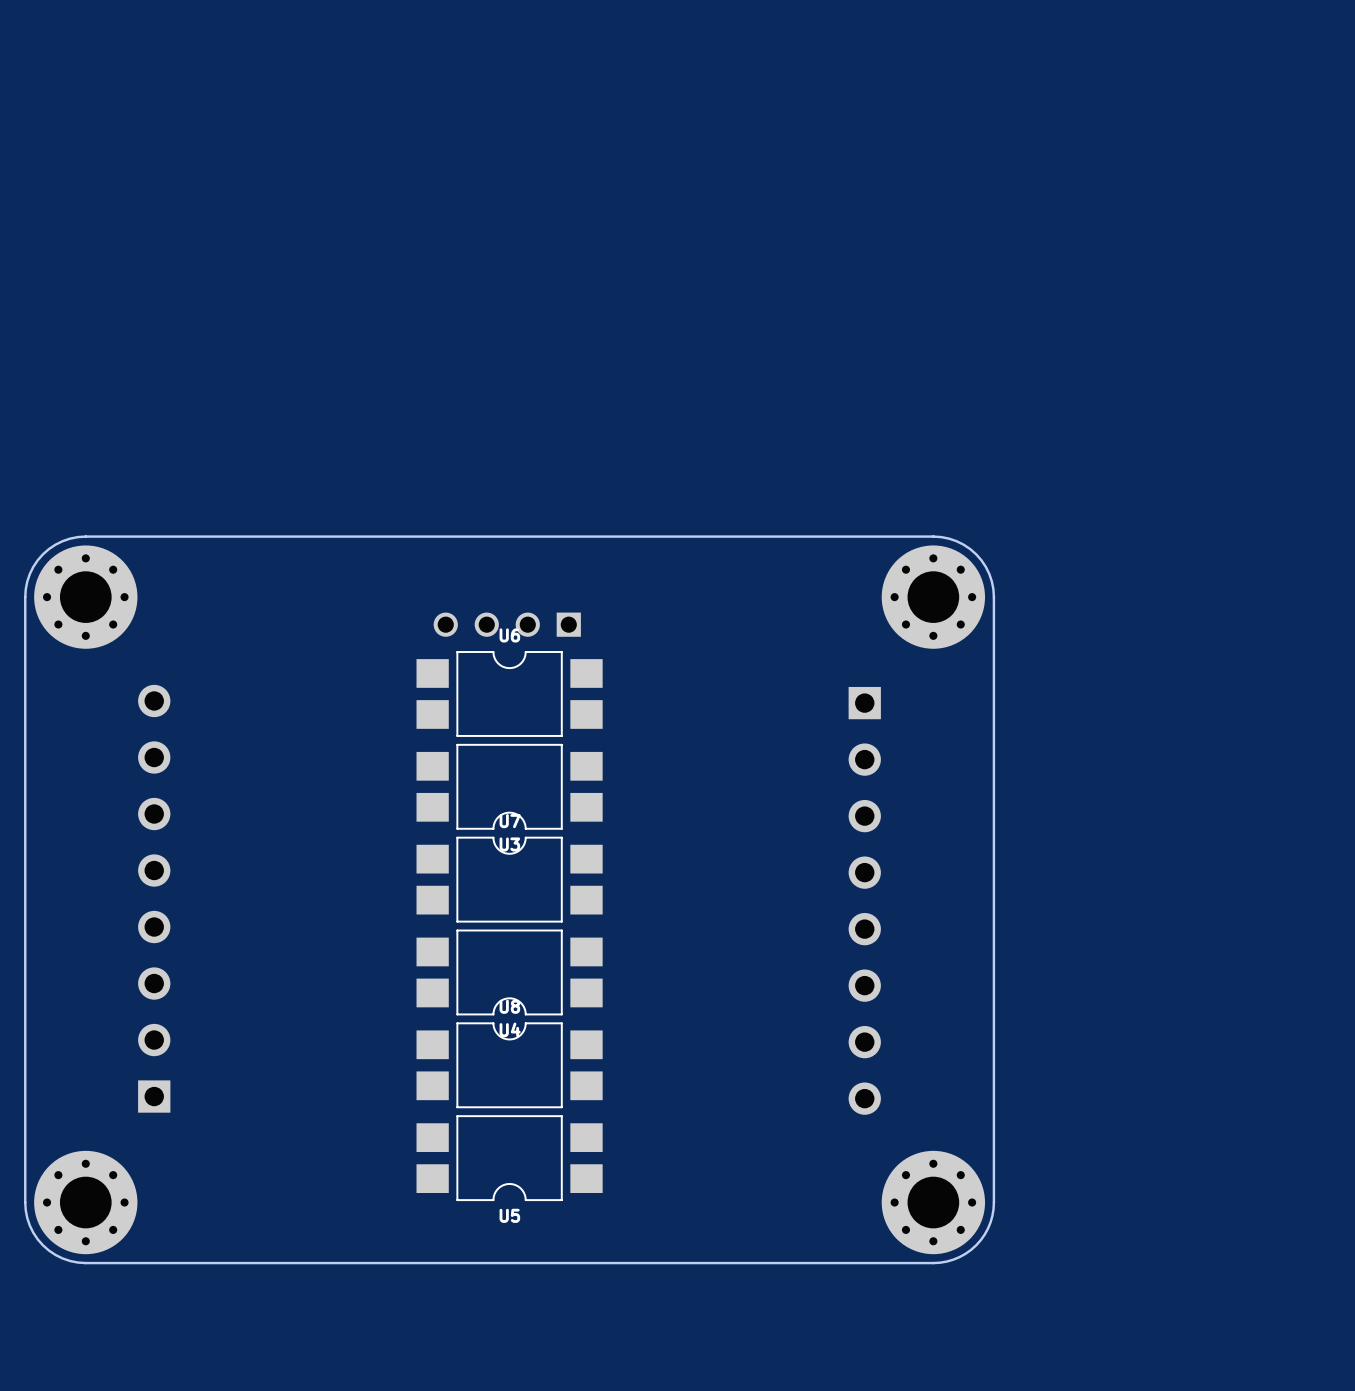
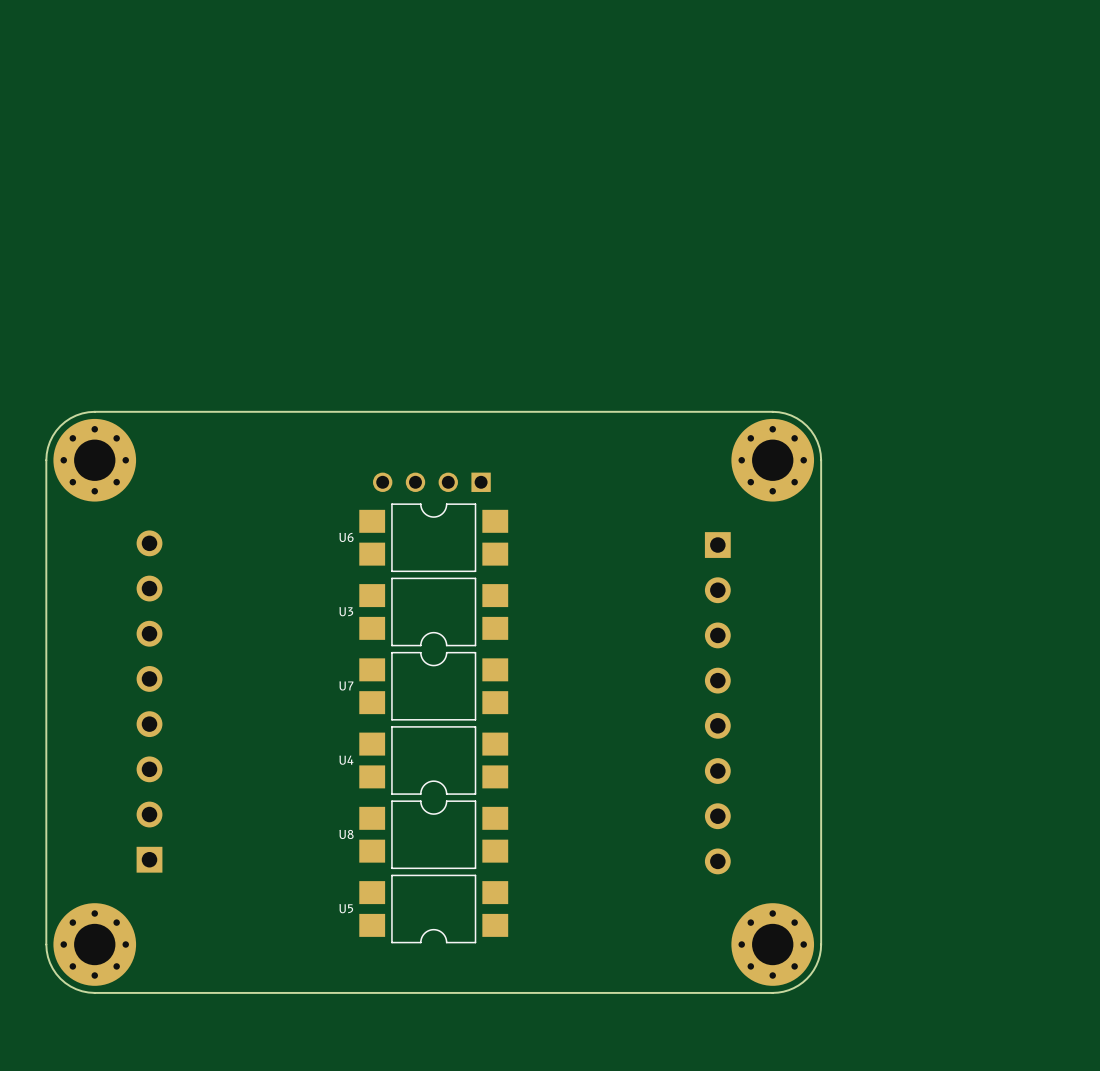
U6 name position: U6 (509, 635) -> U6 (346, 537)
U7 name position: U7 (510, 821) -> U7 (346, 685)
U3 name position: U3 (509, 844) -> U3 (346, 611)
U8 name position: U8 (509, 1006) -> U8 (346, 834)
U4 name position: U4 (510, 1029) -> U4 (346, 760)
U5 name position: U5 (509, 1215) -> U5 (346, 908)

